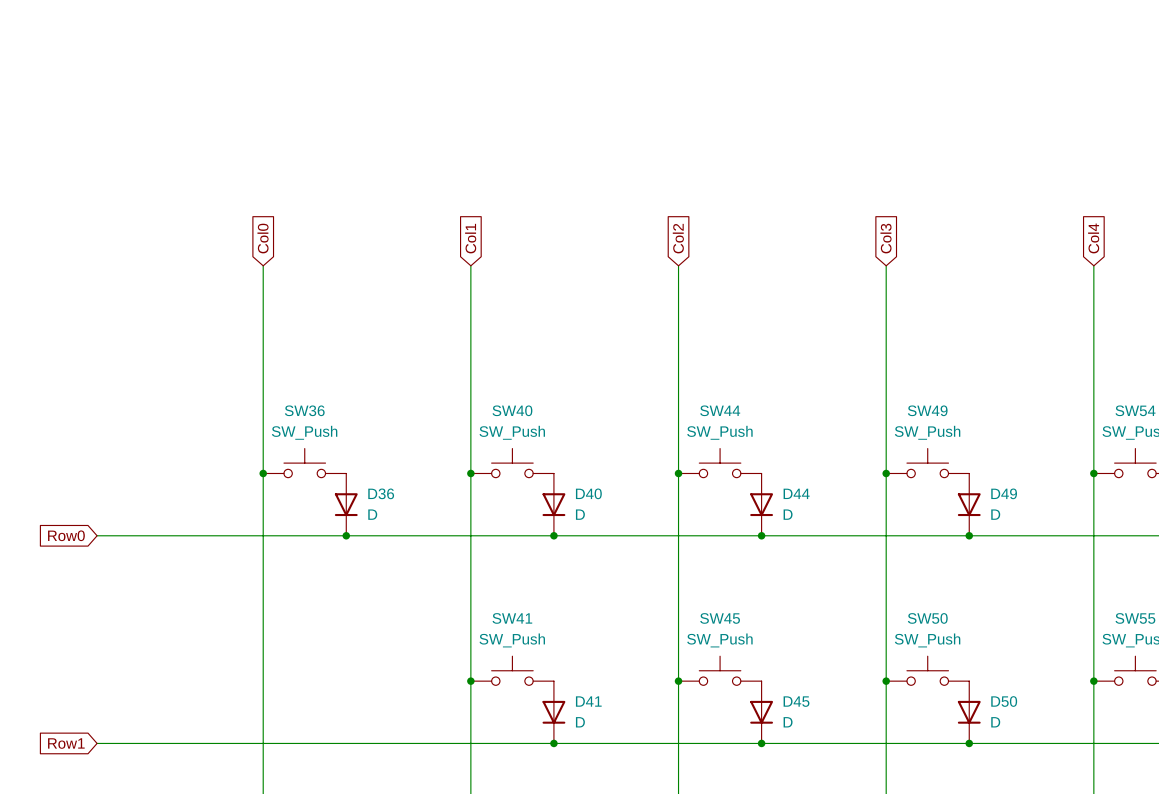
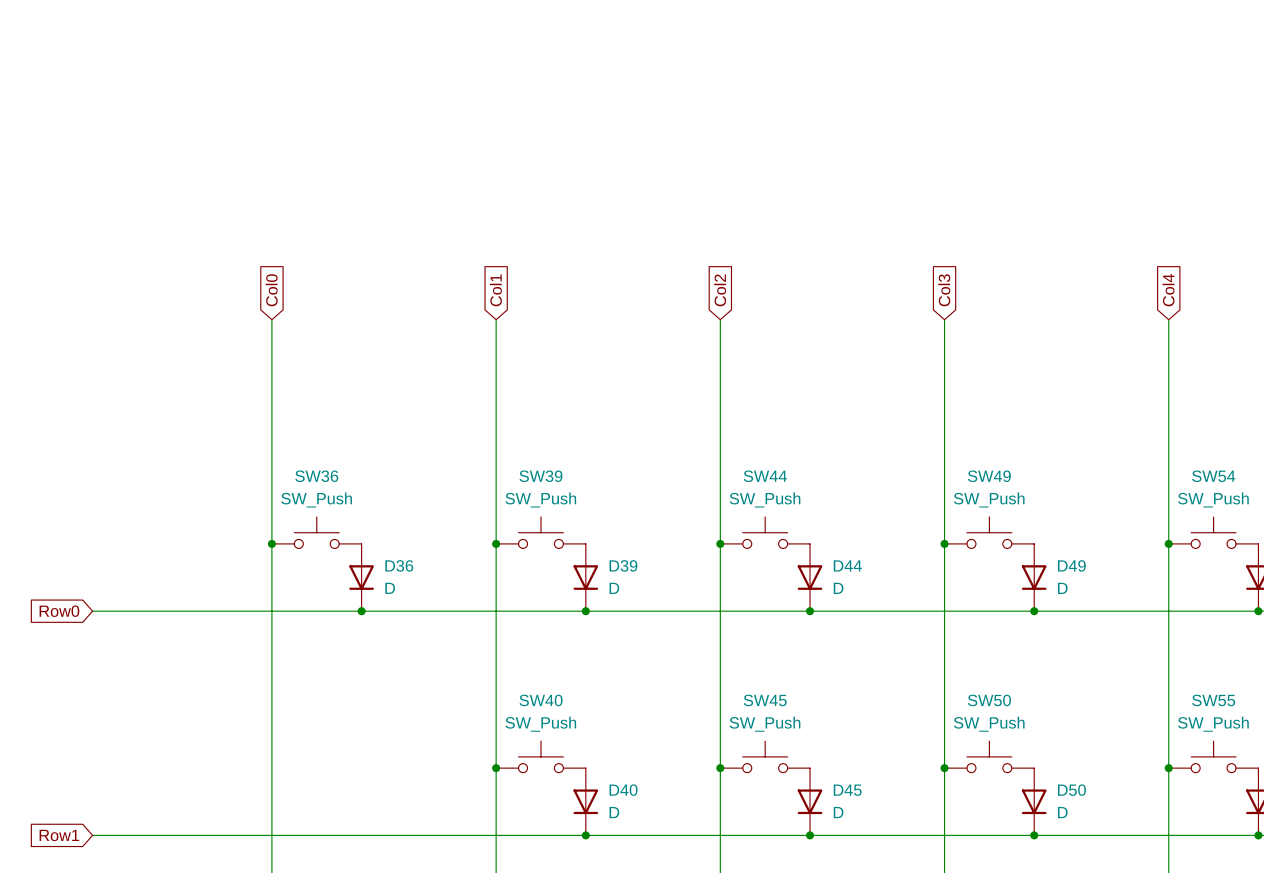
SW40 name: SW40 (512, 410) -> SW39 (540, 476)
D40 name: D40 (588, 493) -> D39 (623, 565)
SW41 name: SW41 (512, 618) -> SW40 (541, 700)
D41 name: D41 (588, 701) -> D40 (623, 790)

